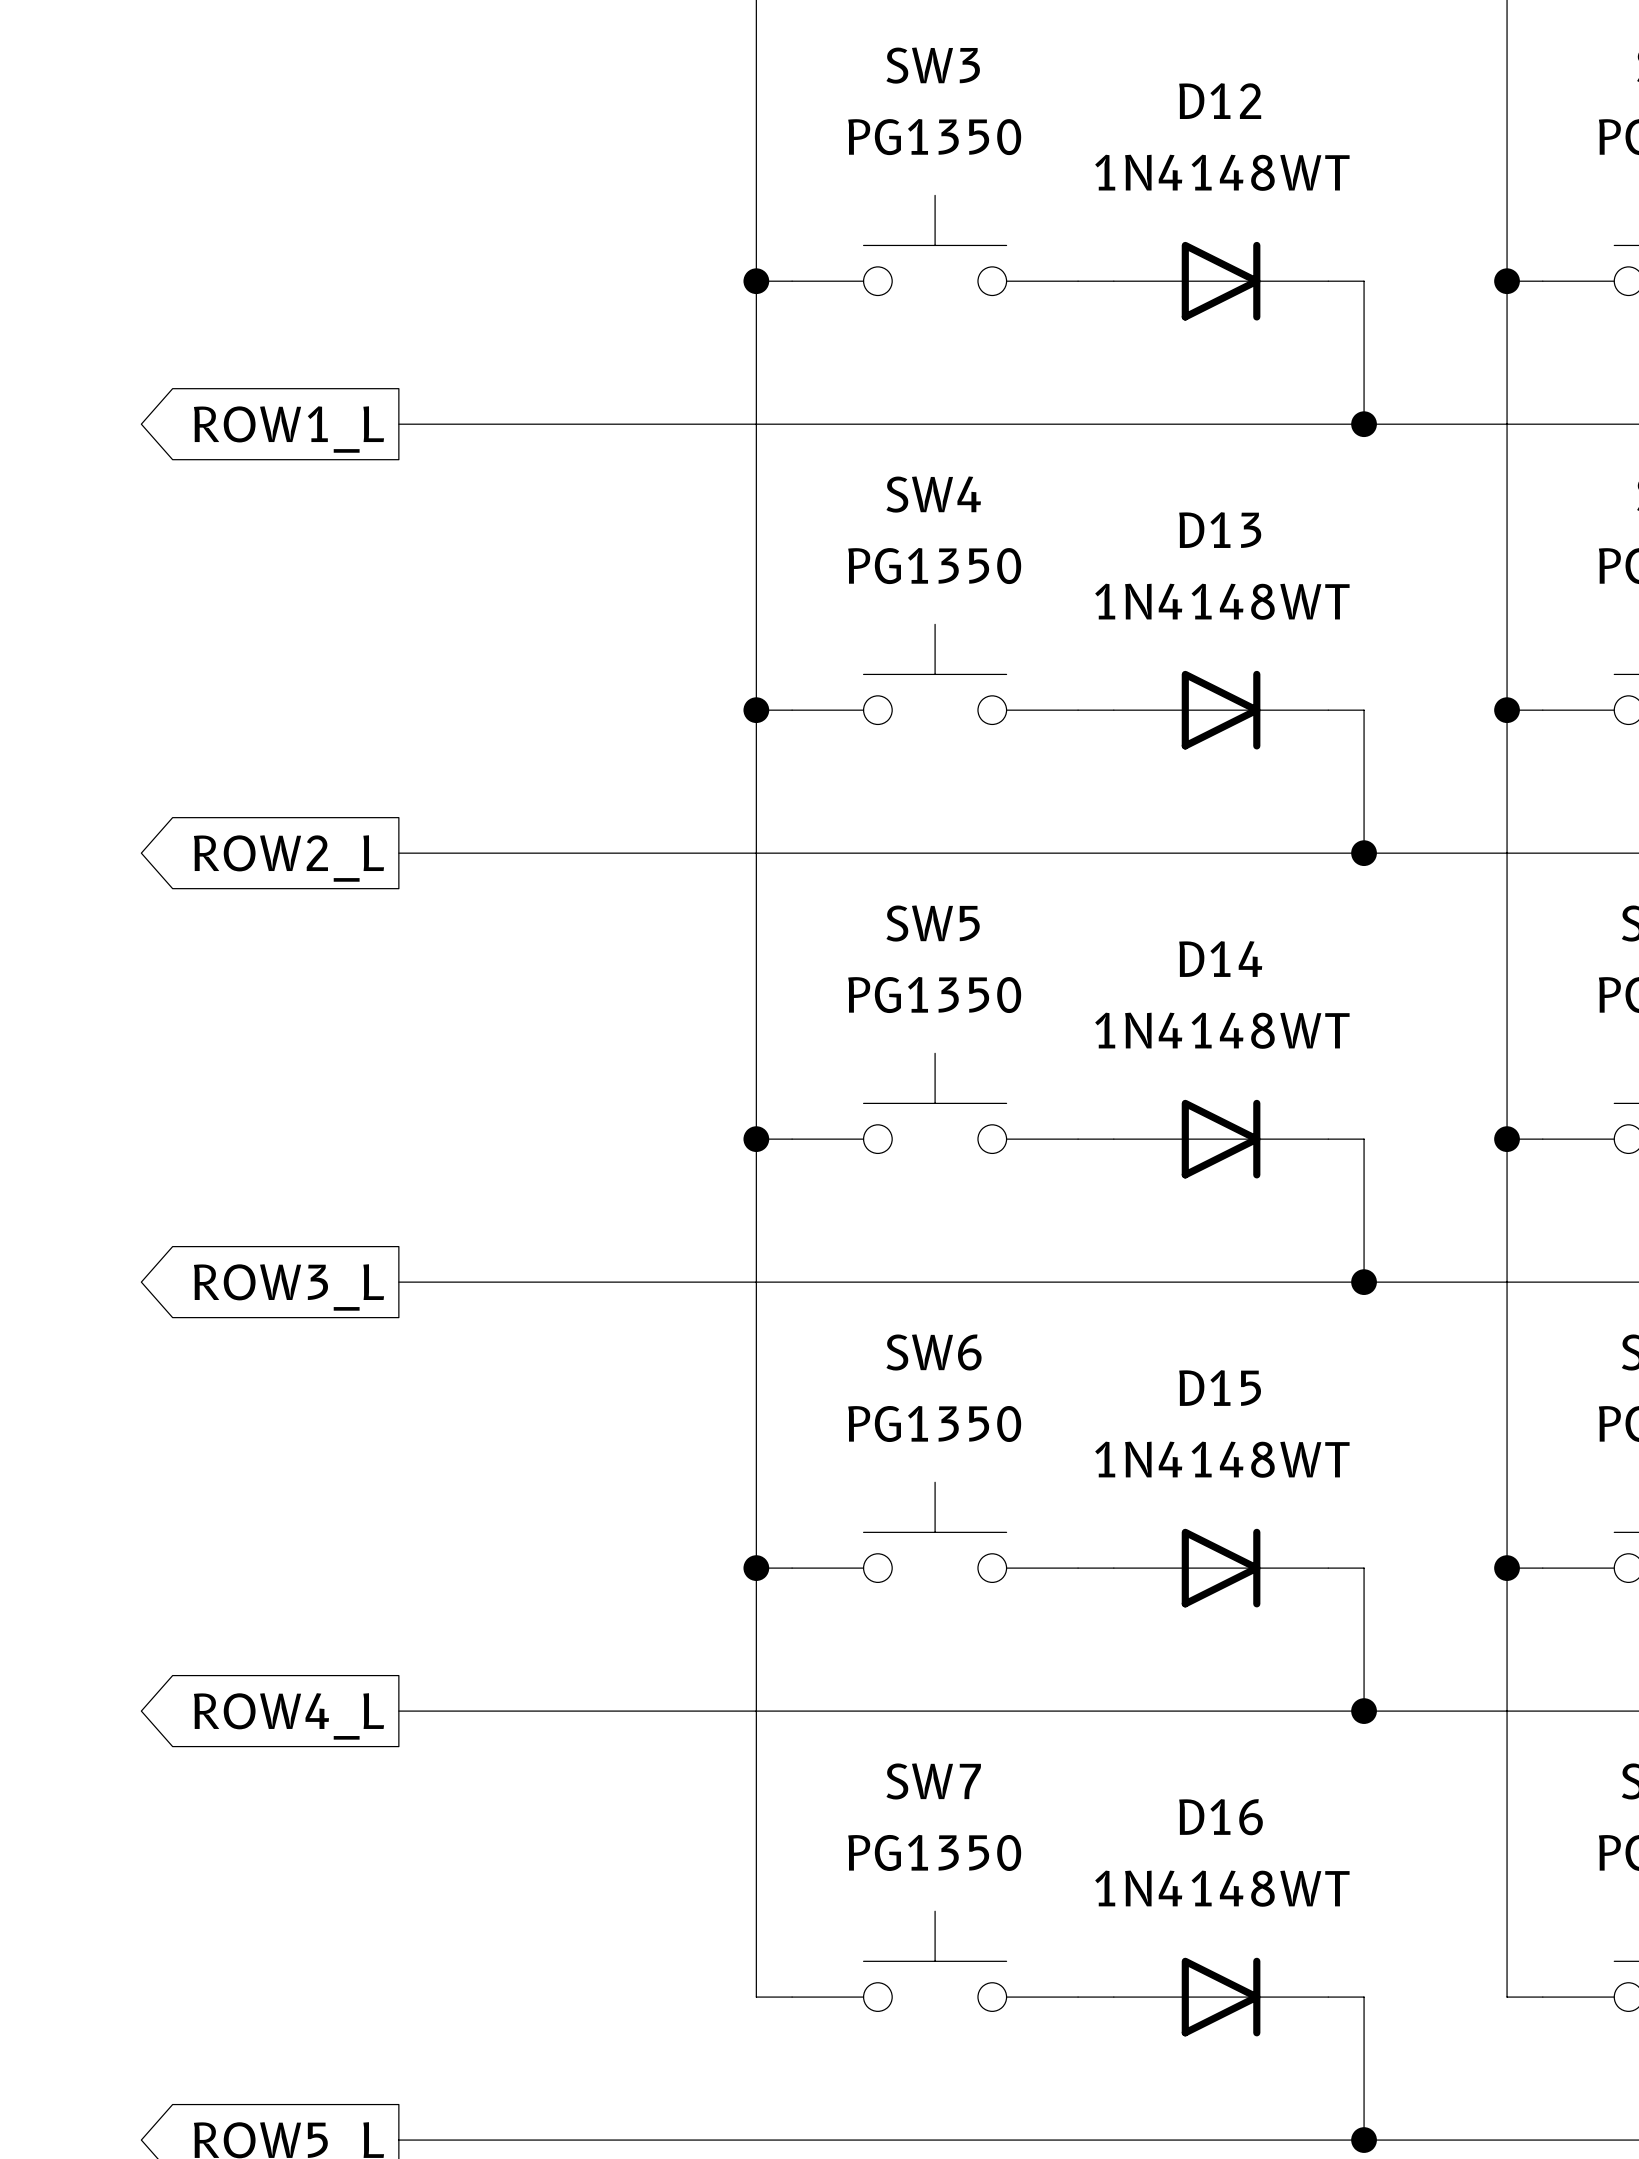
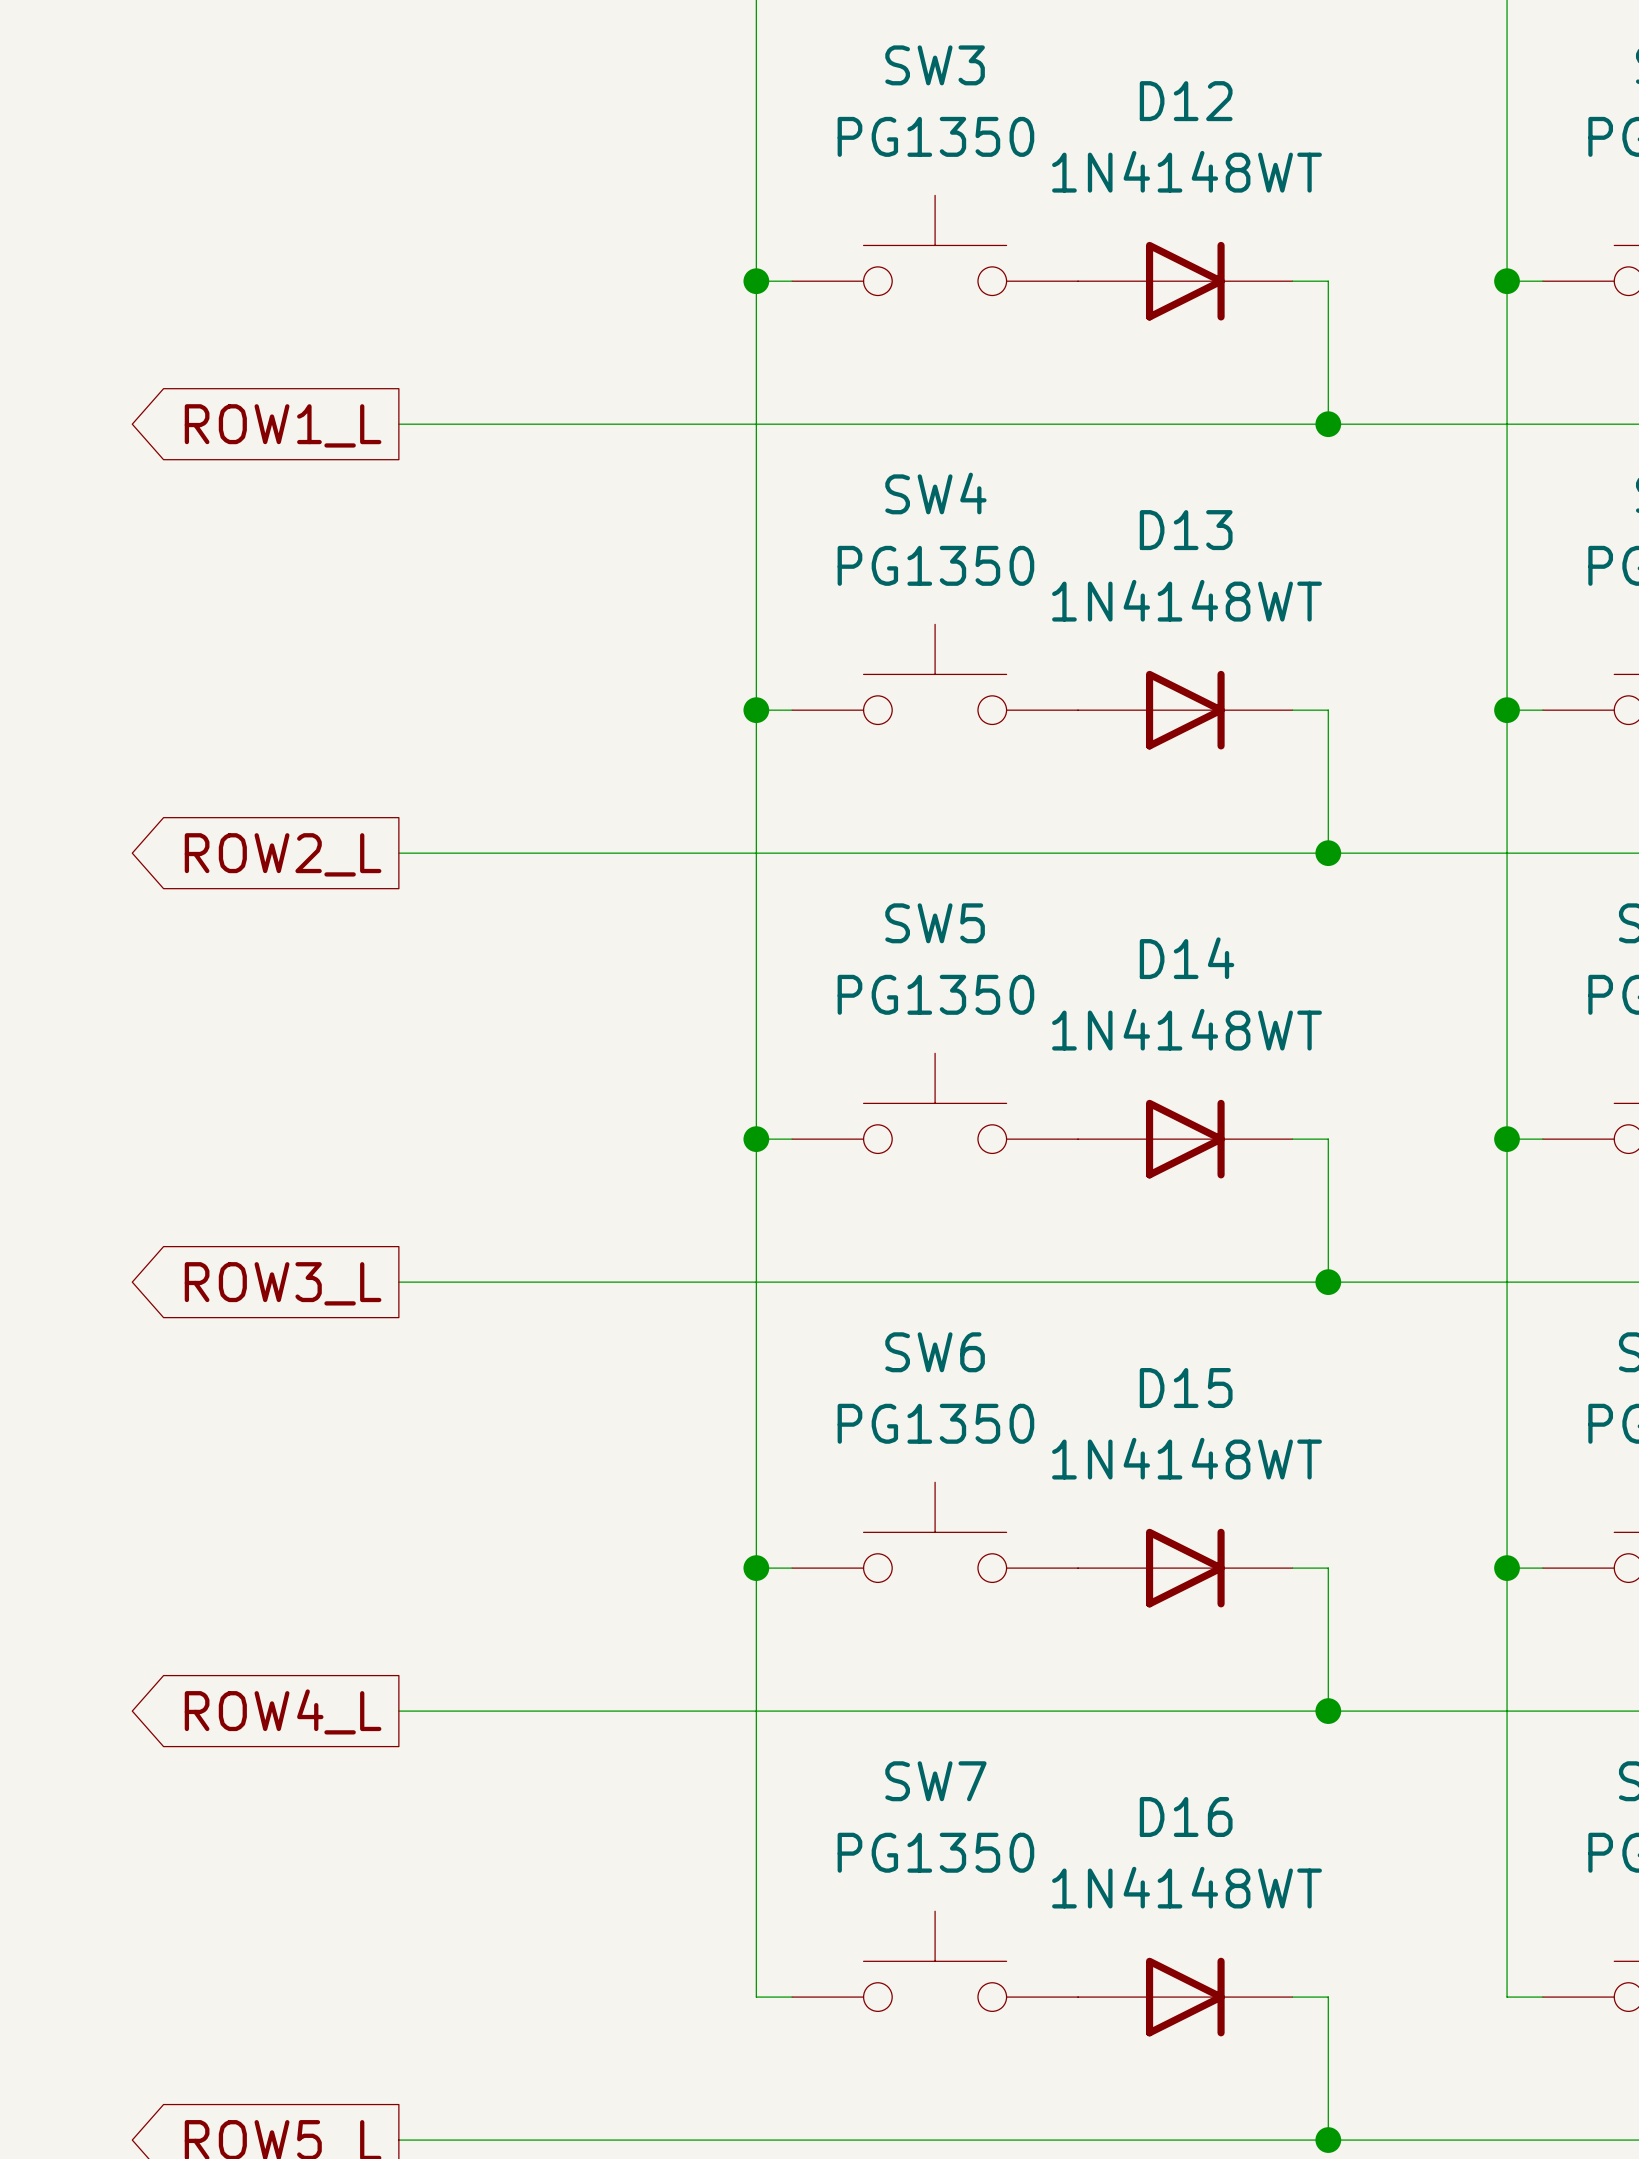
D12 position: (1221, 281) -> (1185, 281)
wire: (1328, 281) (1364, 281) (1364, 424) -> (1292, 281) (1328, 281) (1328, 424)
junction position: (1364, 424) -> (1328, 424)
D13 position: (1221, 710) -> (1185, 710)
wire: (1328, 710) (1364, 710) (1364, 853) -> (1292, 710) (1328, 710) (1328, 853)
junction position: (1364, 853) -> (1328, 853)
D14 position: (1221, 1139) -> (1185, 1139)
wire: (1328, 1139) (1364, 1139) (1364, 1282) -> (1292, 1139) (1328, 1139) (1328, 1282)
junction position: (1364, 1282) -> (1328, 1282)
D15 position: (1221, 1568) -> (1185, 1568)
wire: (1328, 1568) (1364, 1568) (1364, 1711) -> (1292, 1568) (1328, 1568) (1328, 1711)
junction position: (1364, 1711) -> (1328, 1711)
D16 position: (1221, 1997) -> (1185, 1997)
wire: (1328, 1997) (1364, 1997) (1364, 2140) -> (1292, 1997) (1328, 1997) (1328, 2140)
junction position: (1364, 2140) -> (1328, 2140)

